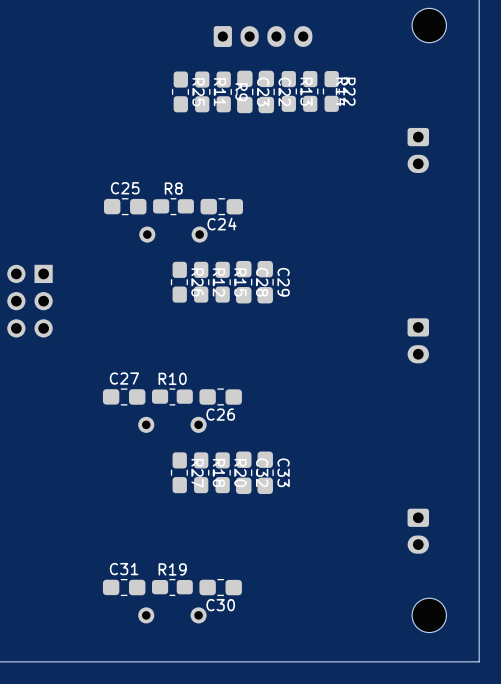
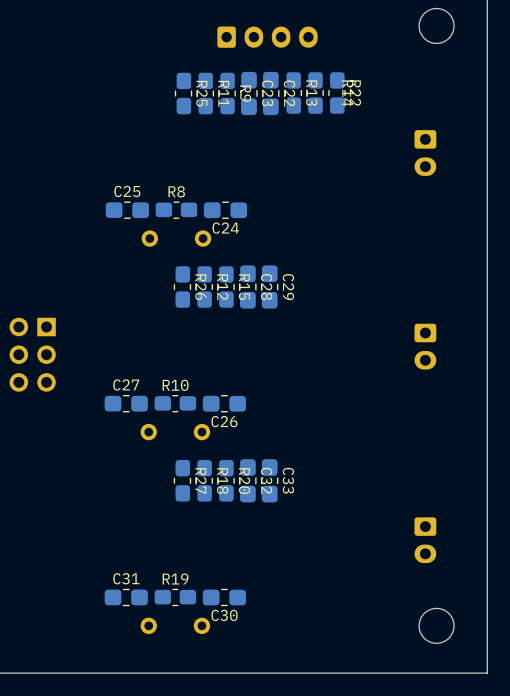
part position: (29, 301) -> (32, 354)

